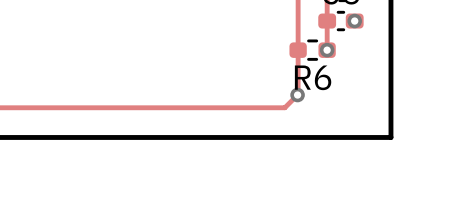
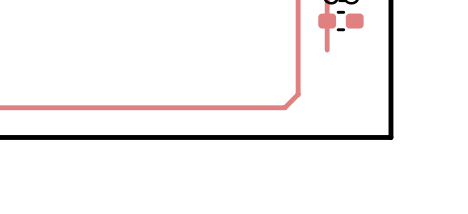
via: (354, 21) -> none
R6: (312, 50) -> none
via: (327, 50) -> none
via: (297, 95) -> none

